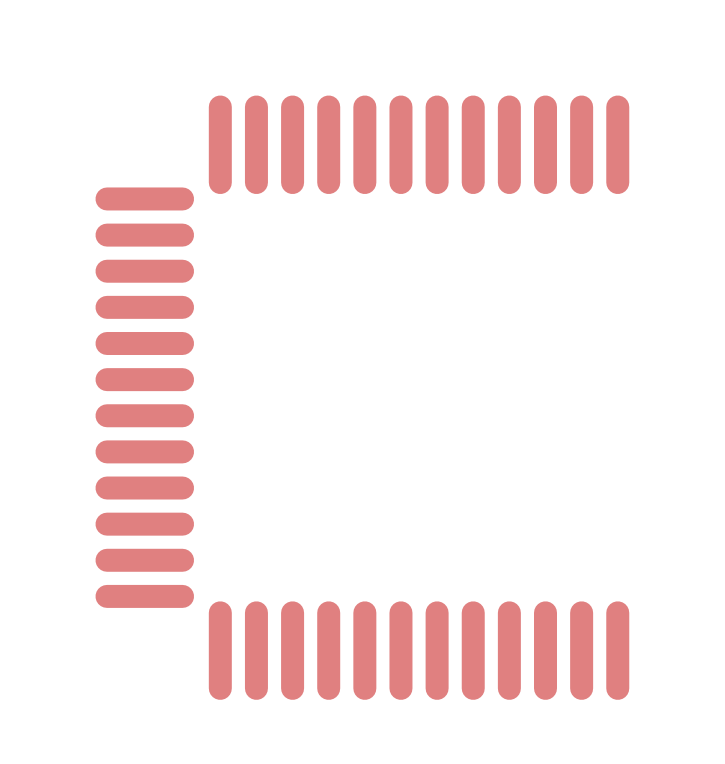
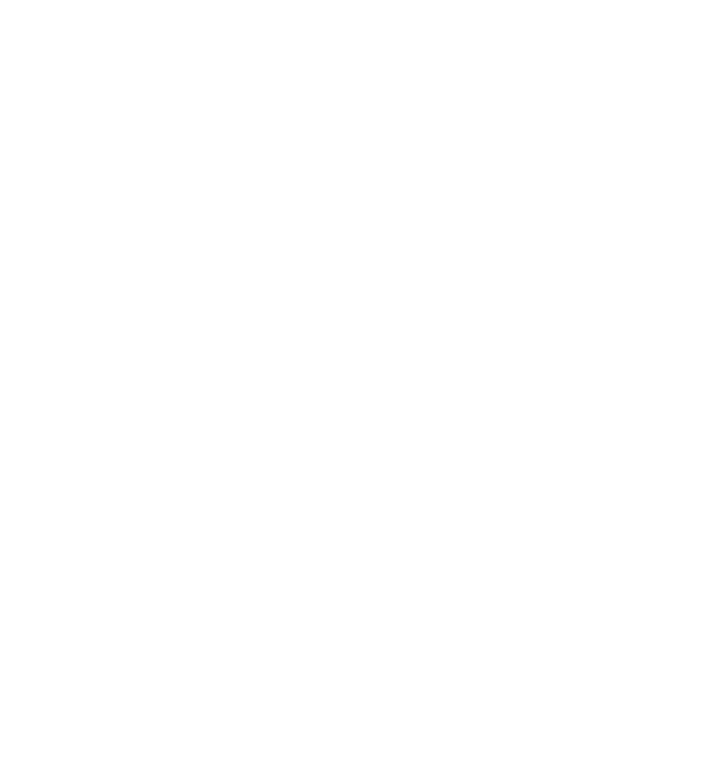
part: (362, 397) -> none

